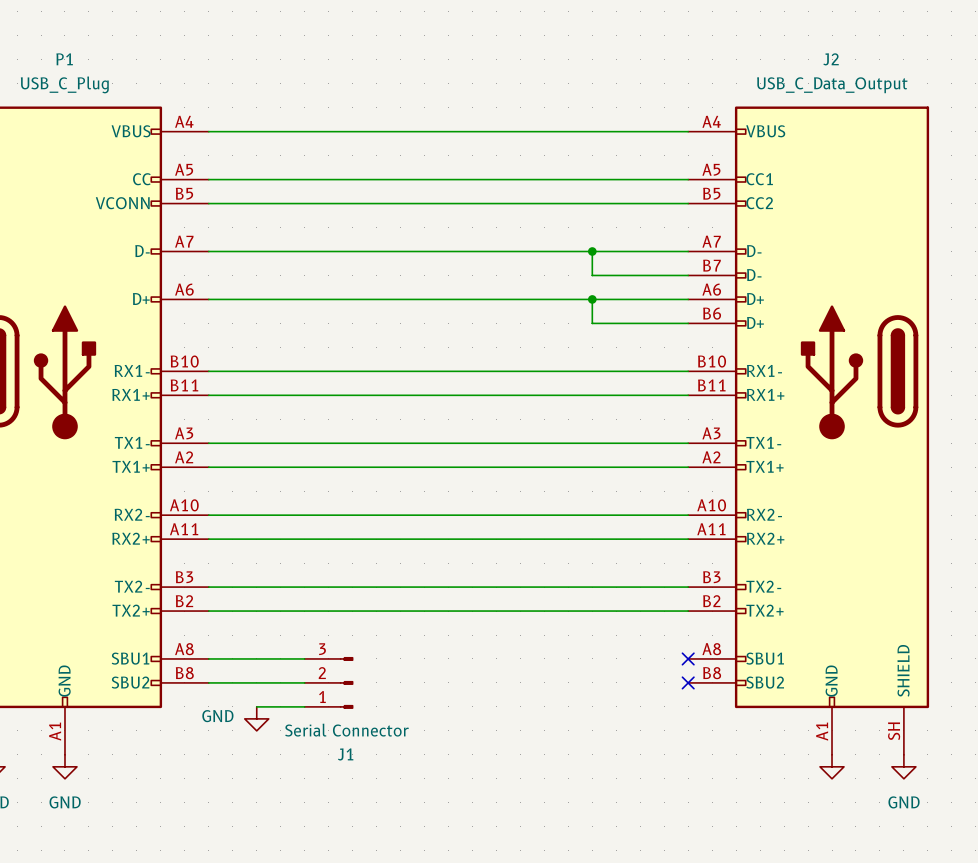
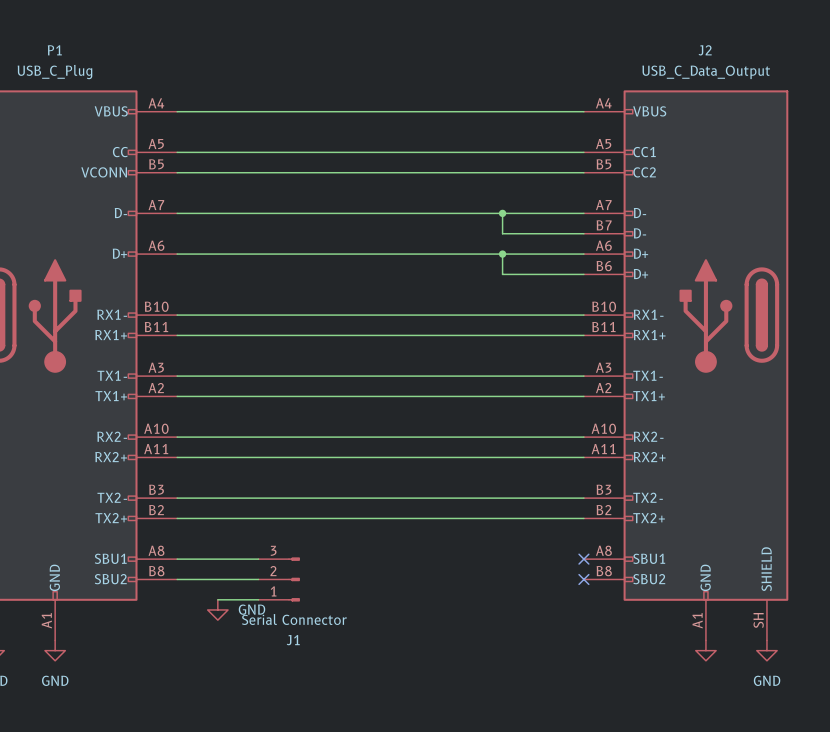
power symbol text position: GND (217, 716) -> GND (251, 609)

